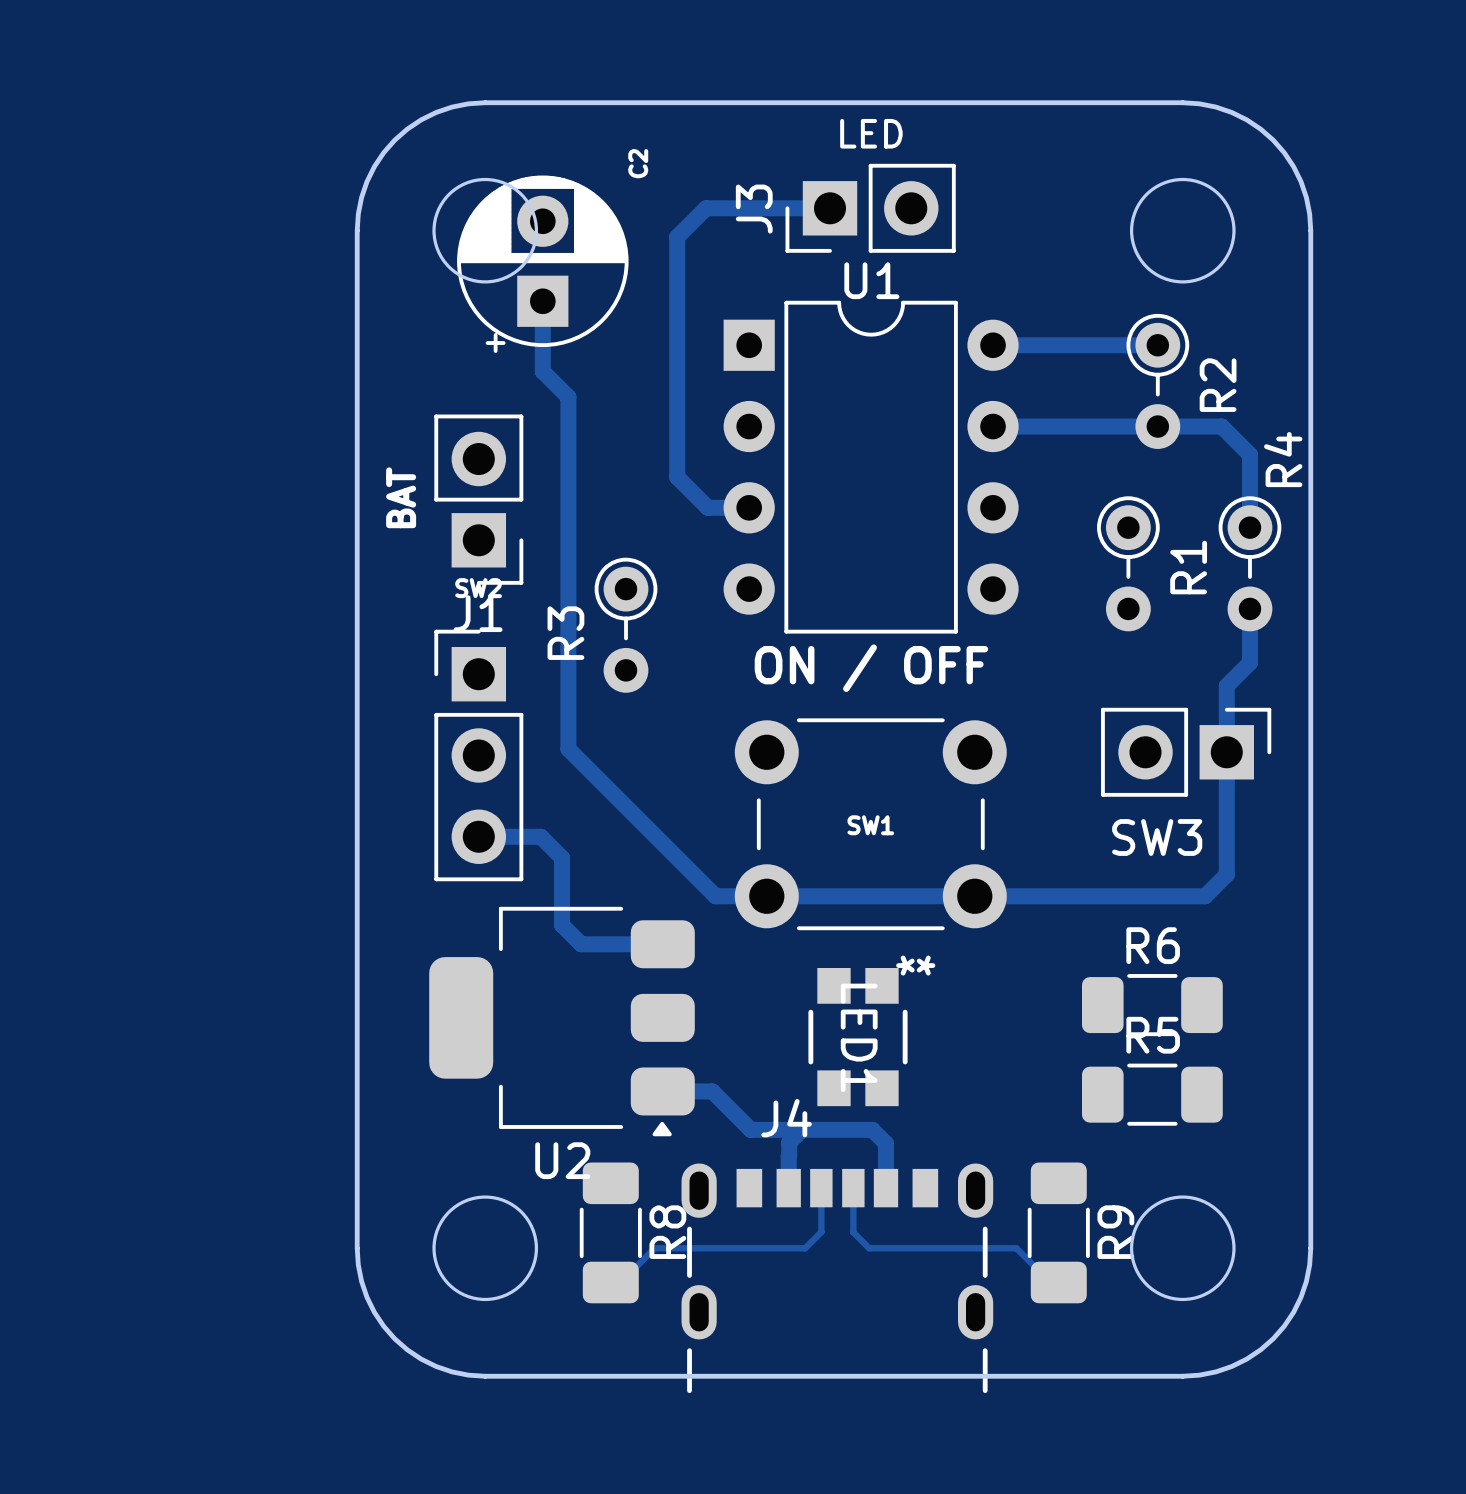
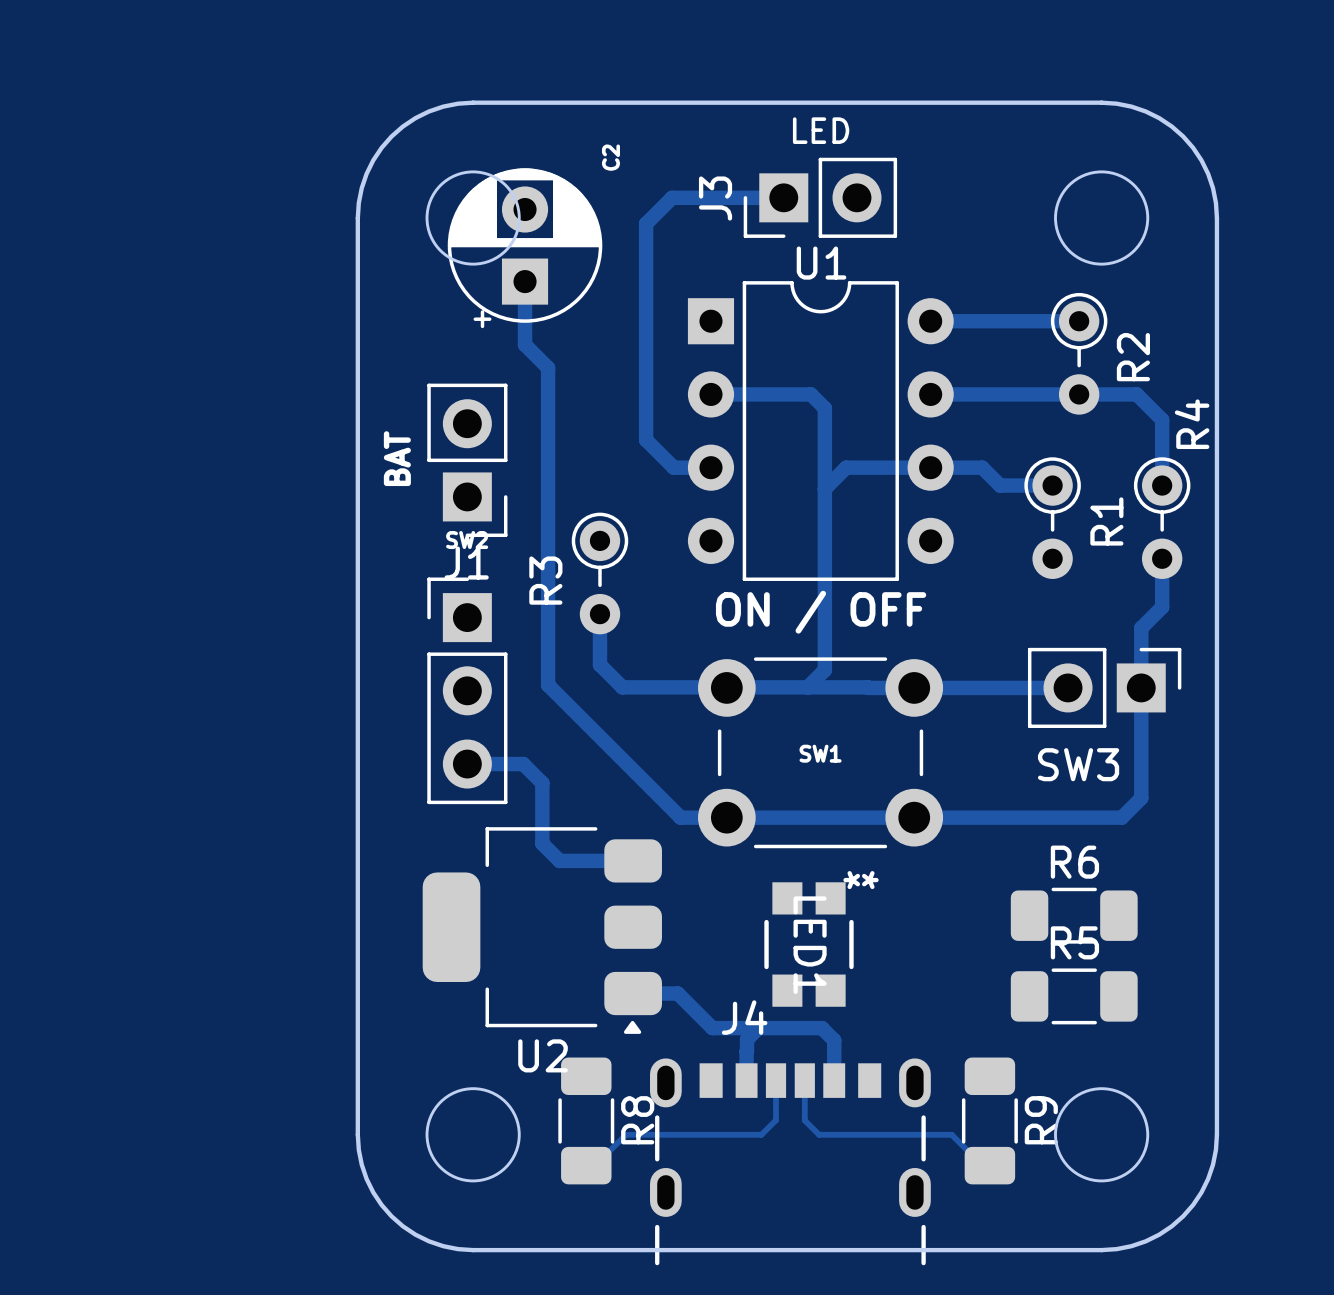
track: none -> (713, 394) (811, 394) (824, 408) (824, 670) (807, 687)
track: none -> (1052, 485) (1000, 485) (982, 467) (846, 467) (824, 489)
track: none -> (599, 614) (599, 664) (622, 687) (1068, 687)

